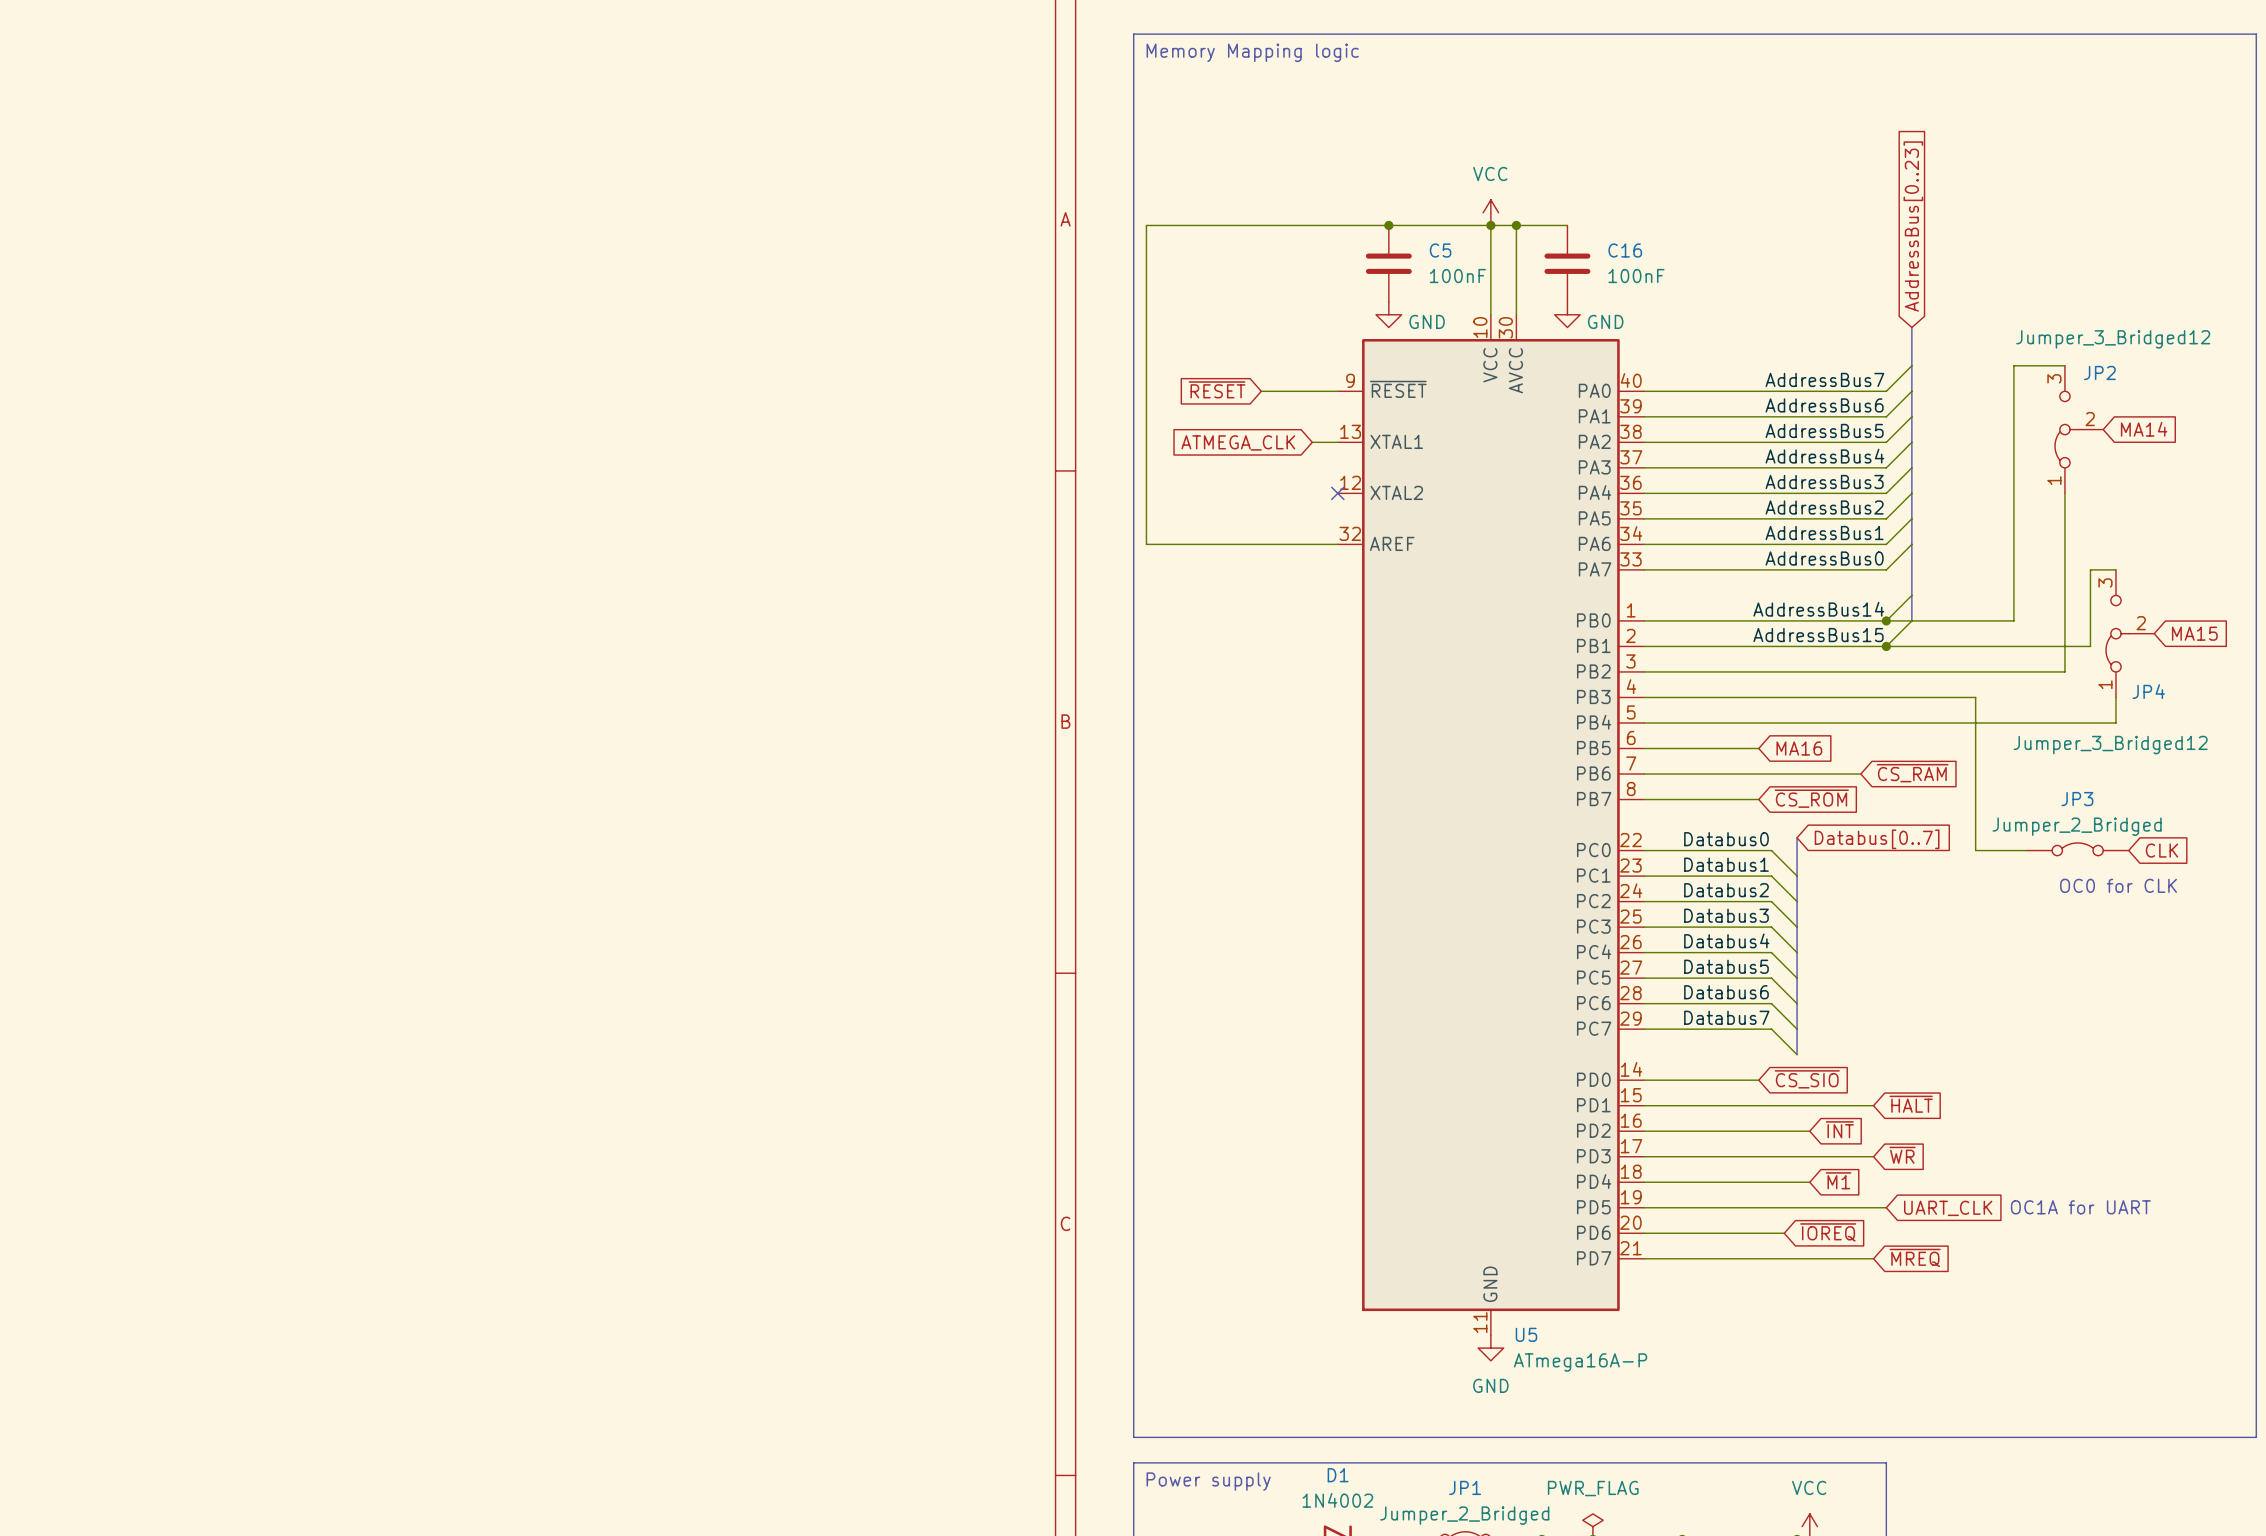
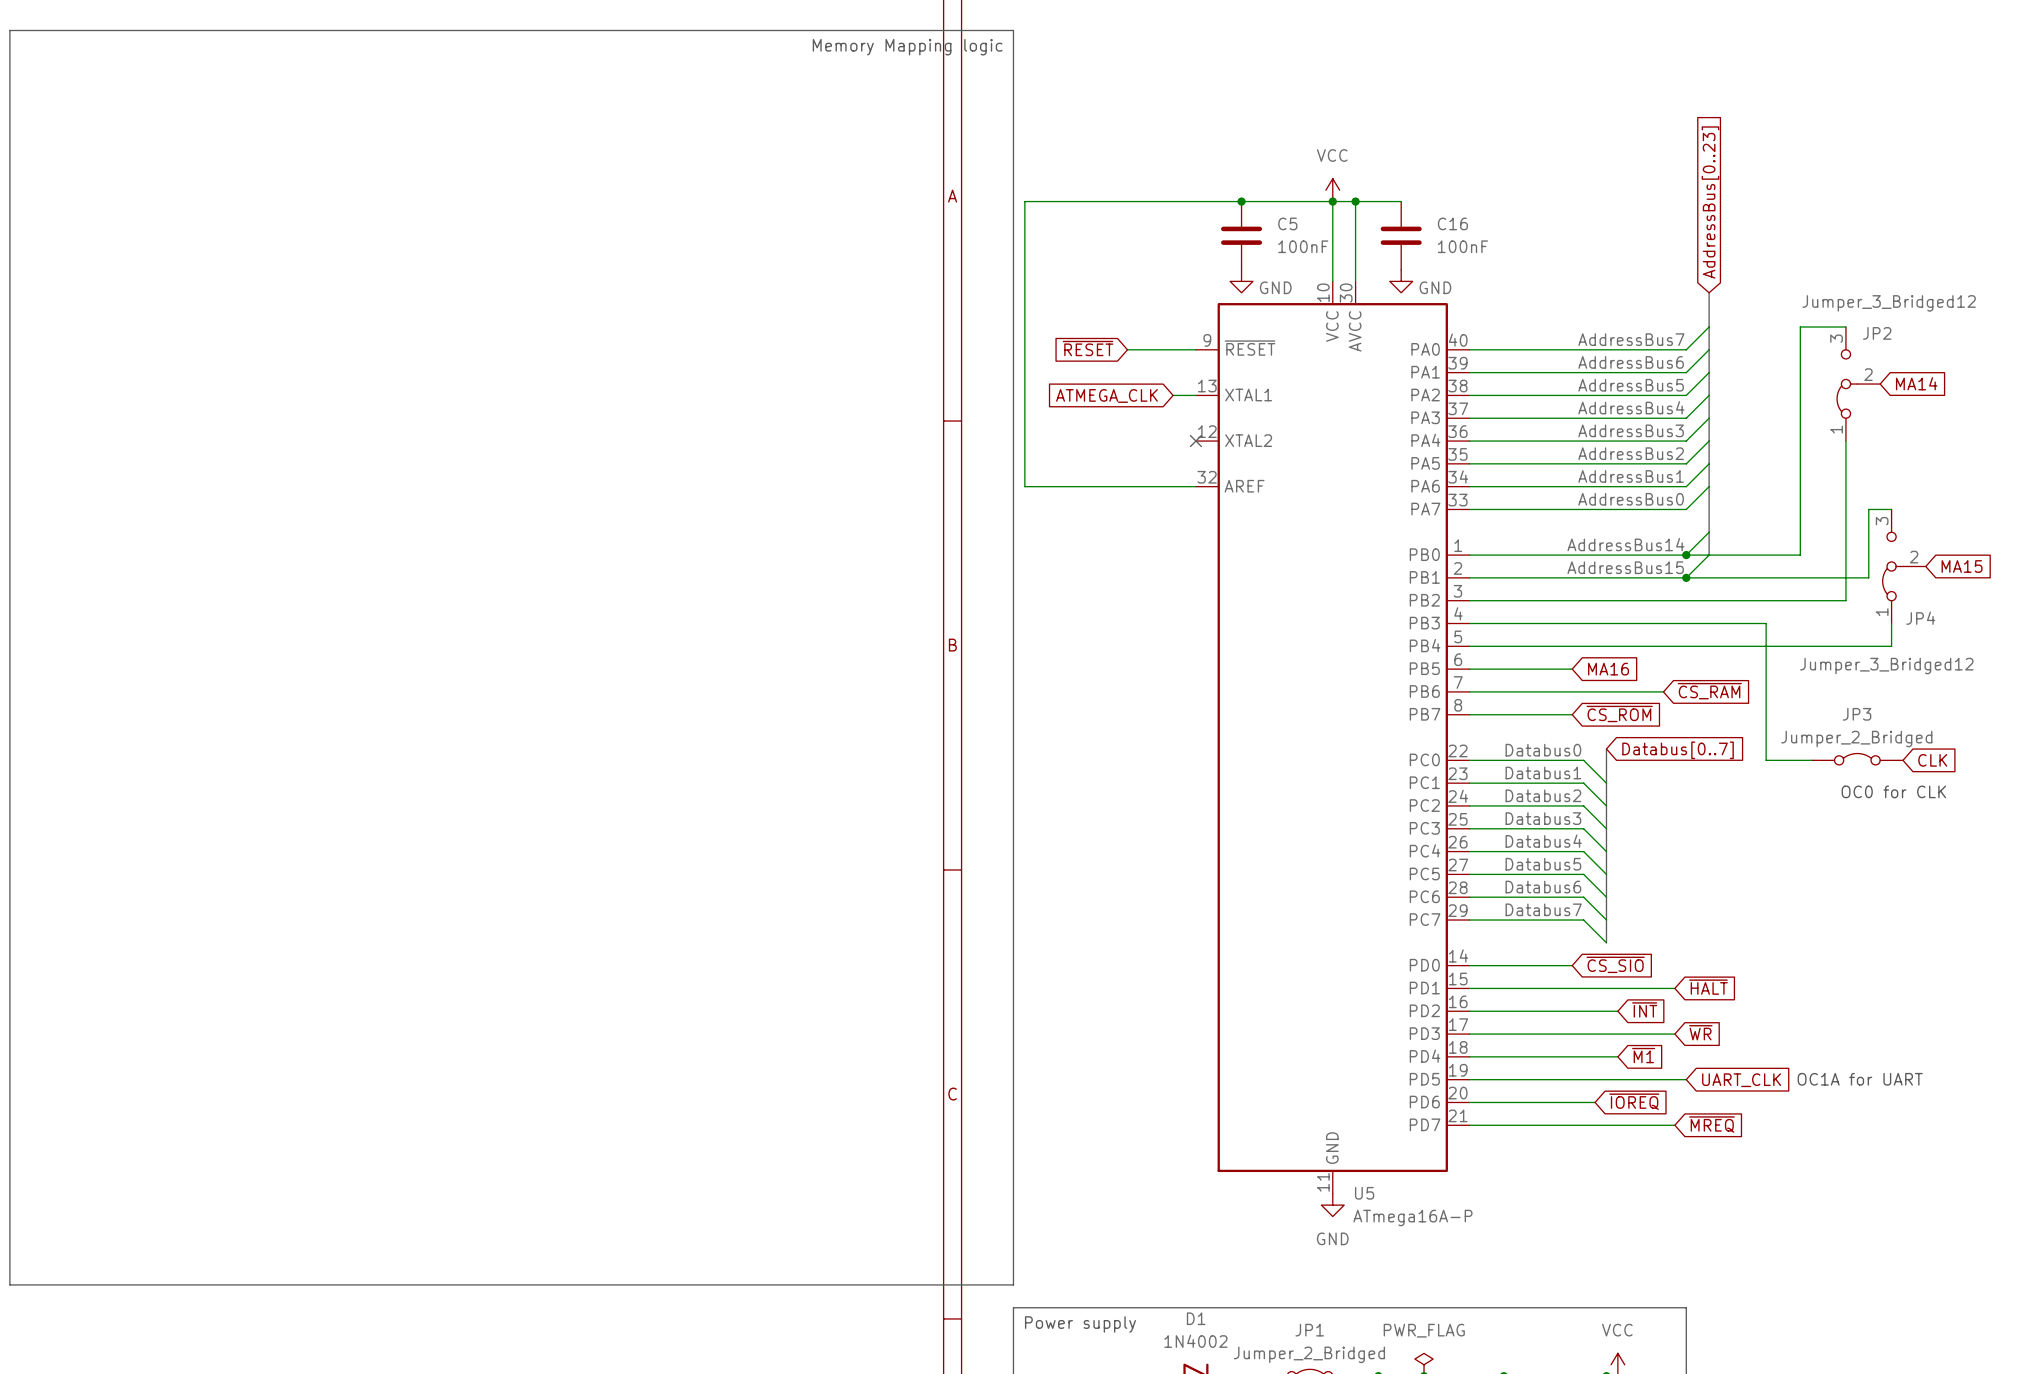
line: (1133, 34) (2256, 34) (2256, 1437) (1133, 1437) -> (1013, 30) (9, 30) (9, 1284) (1013, 1284)
text position: Memory Mapping logic (1252, 52) -> Memory Mapping logic (907, 47)

